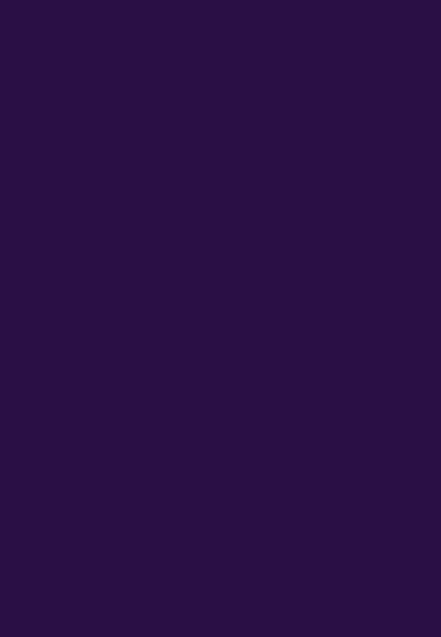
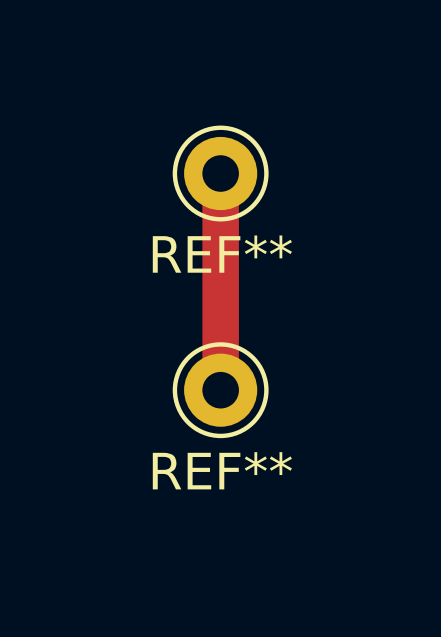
track: none -> (220, 173) (220, 390)
REF**: none -> (220, 173)
REF**: none -> (220, 390)

